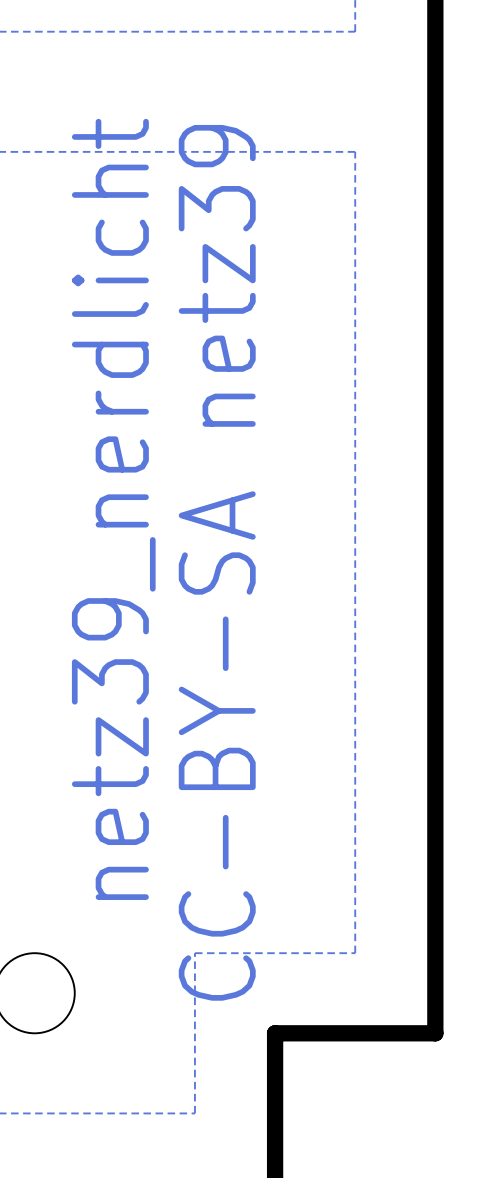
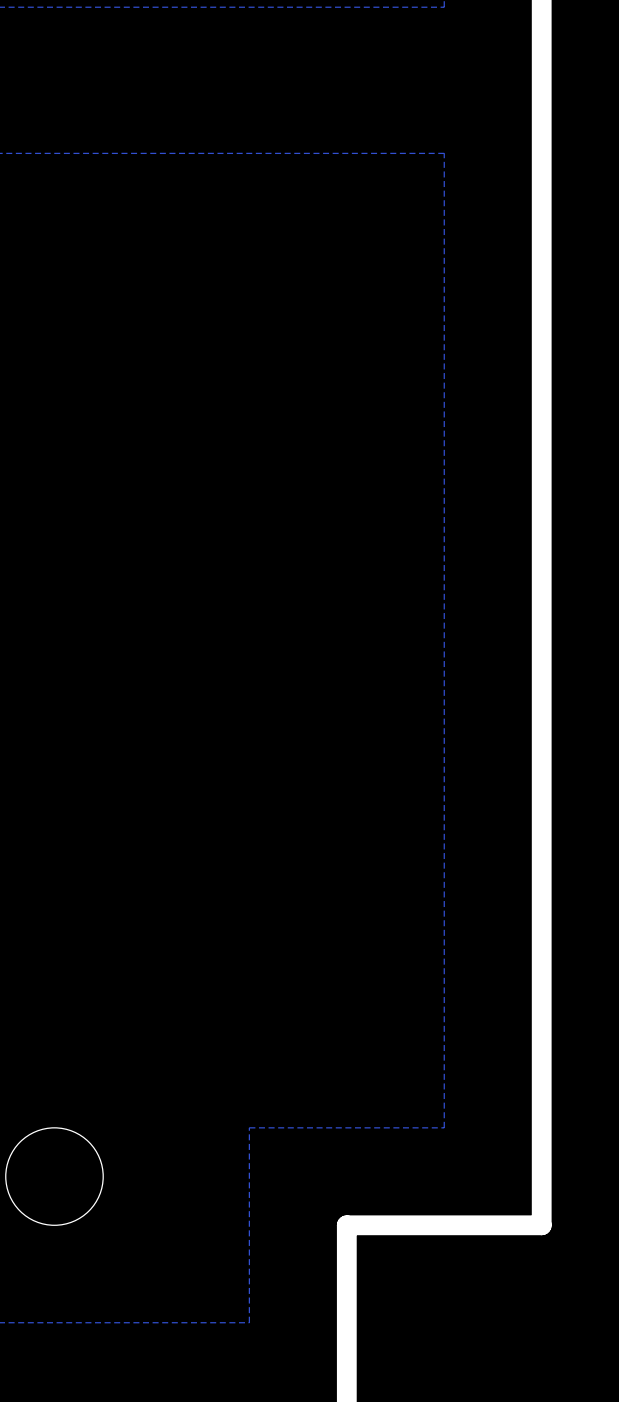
text: netz39_nerdlicht (113, 509) -> none
text: CC-BY-SA netz39 (217, 562) -> none

